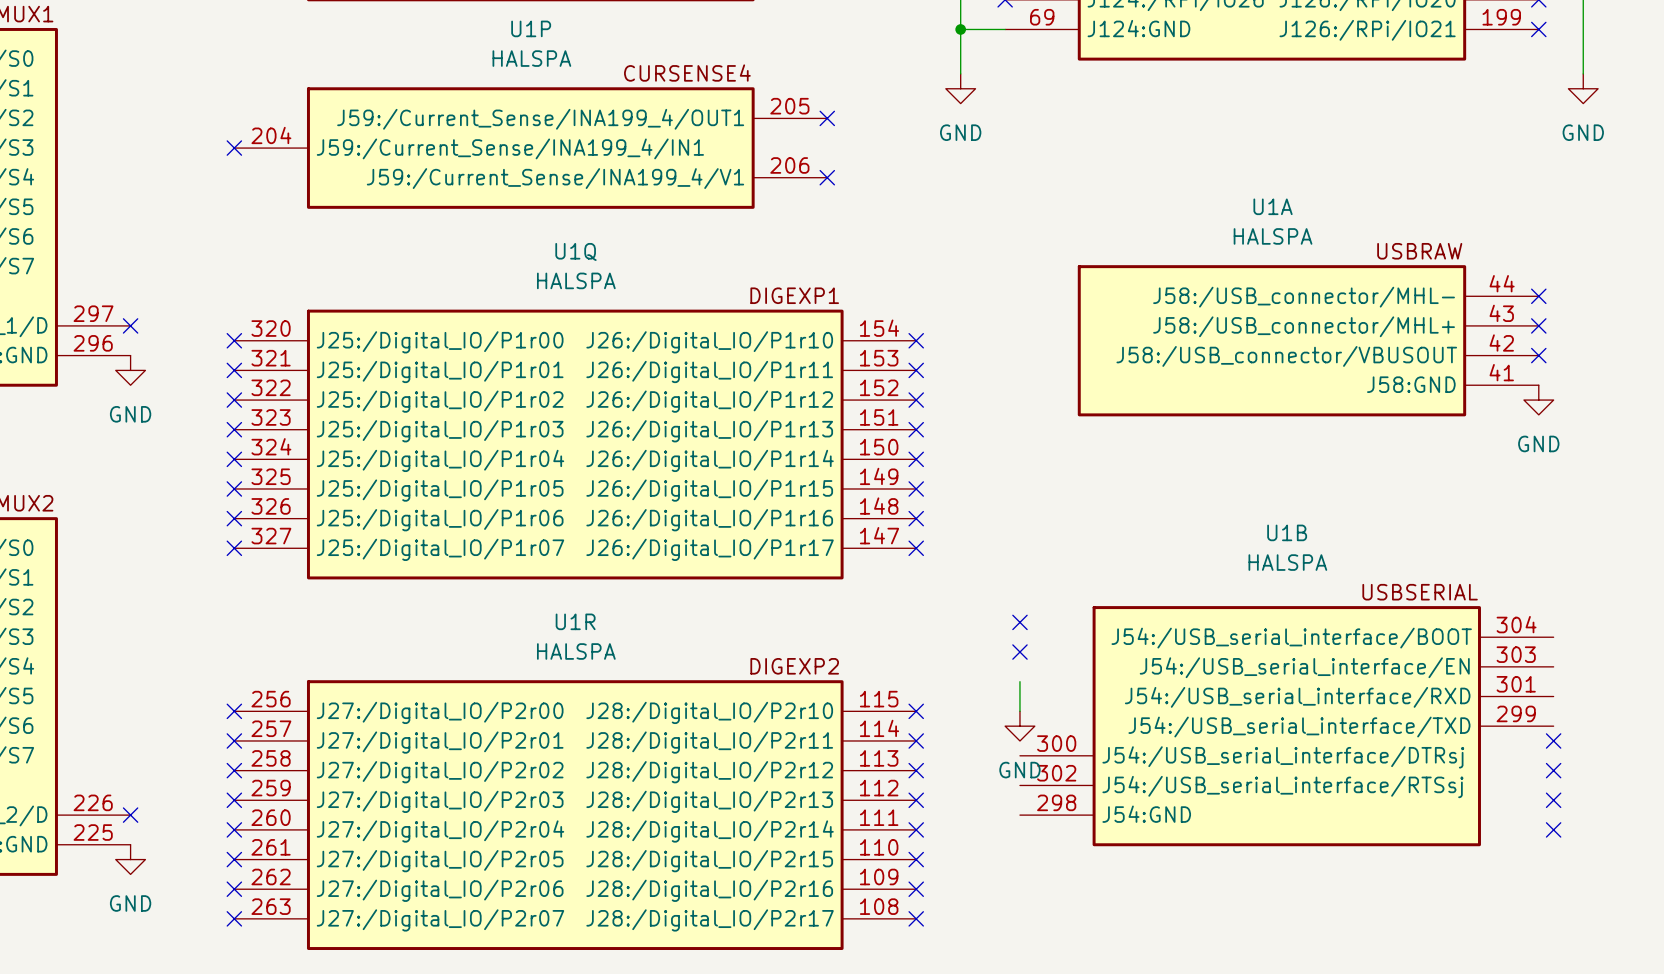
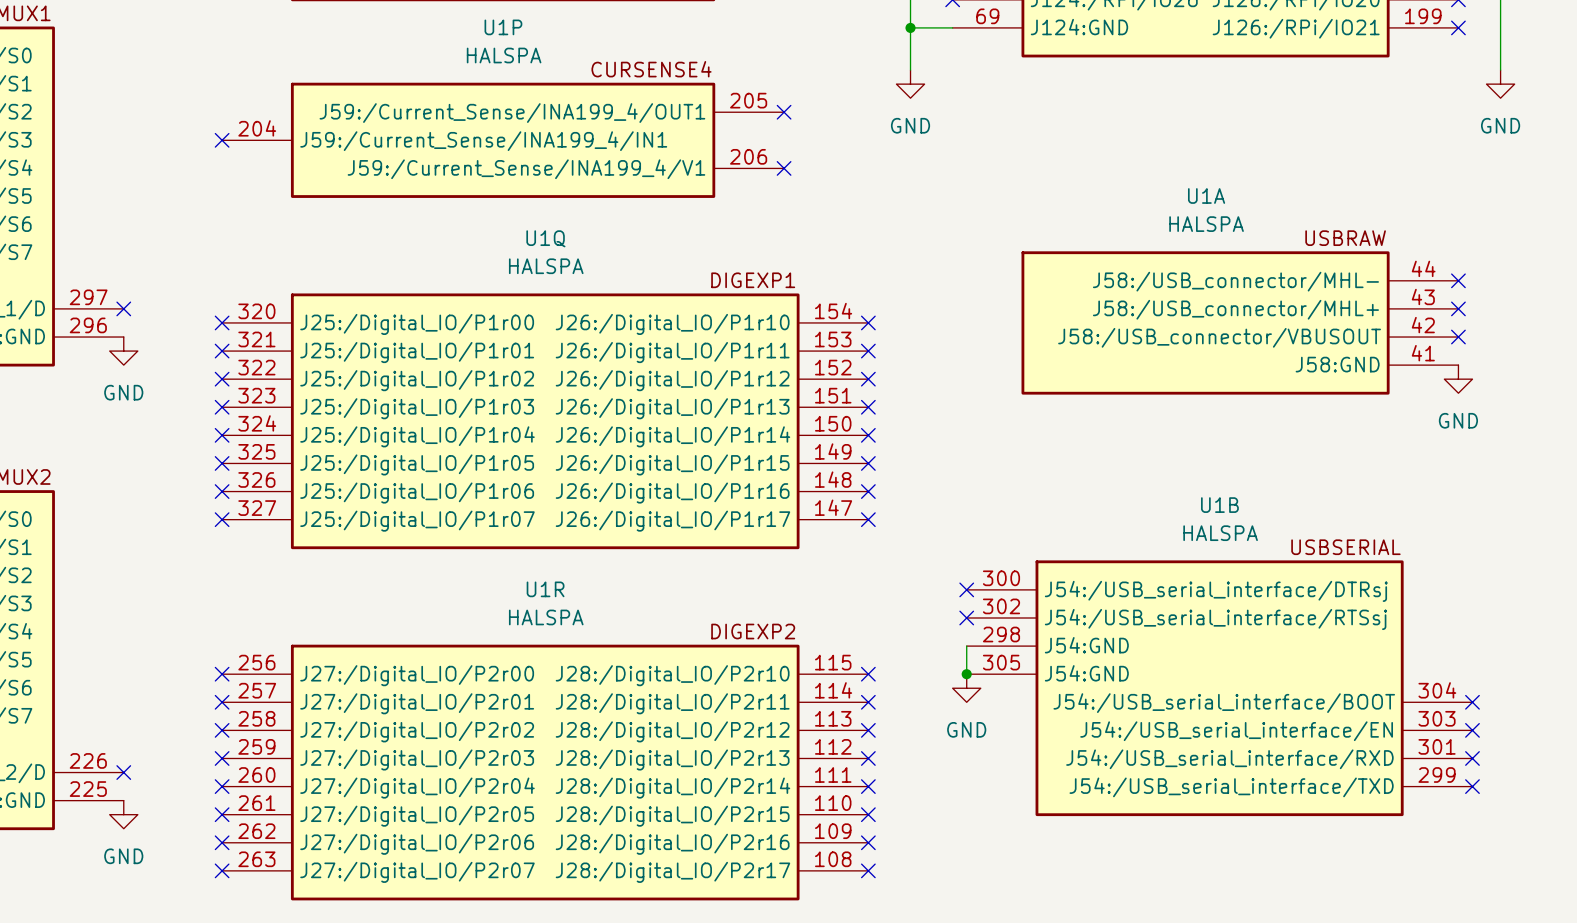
U1B symbol: [1019, 606, 1554, 847] -> [966, 560, 1473, 817]
junction: none -> (966, 674)

